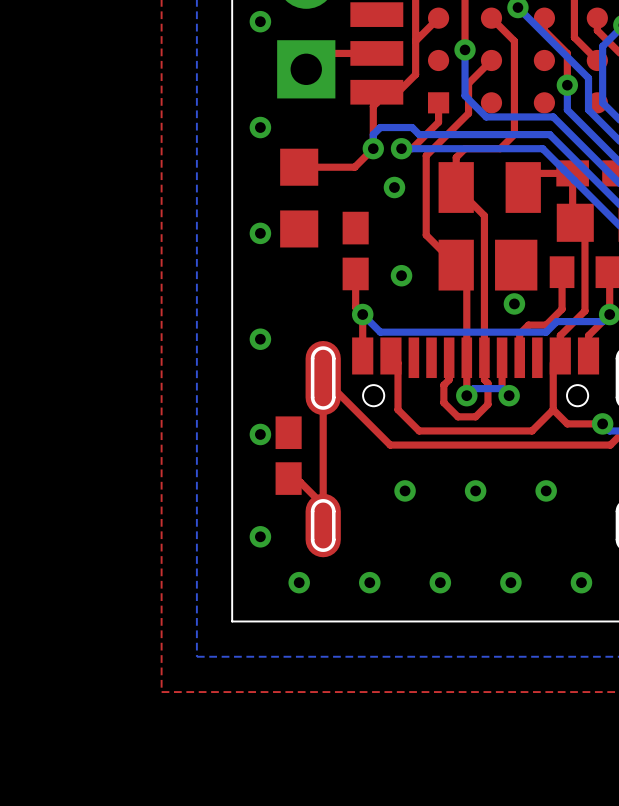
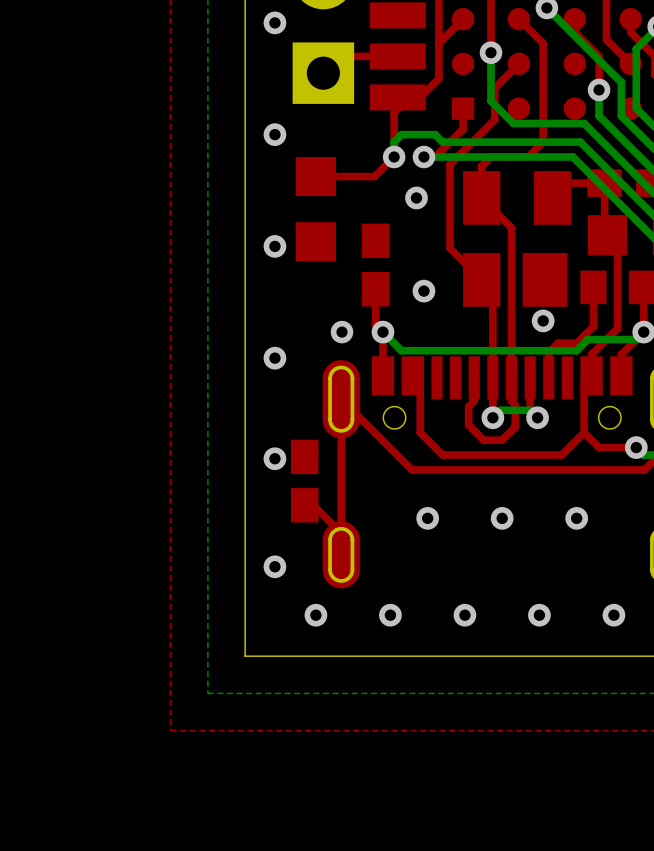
via: none -> (342, 332)

